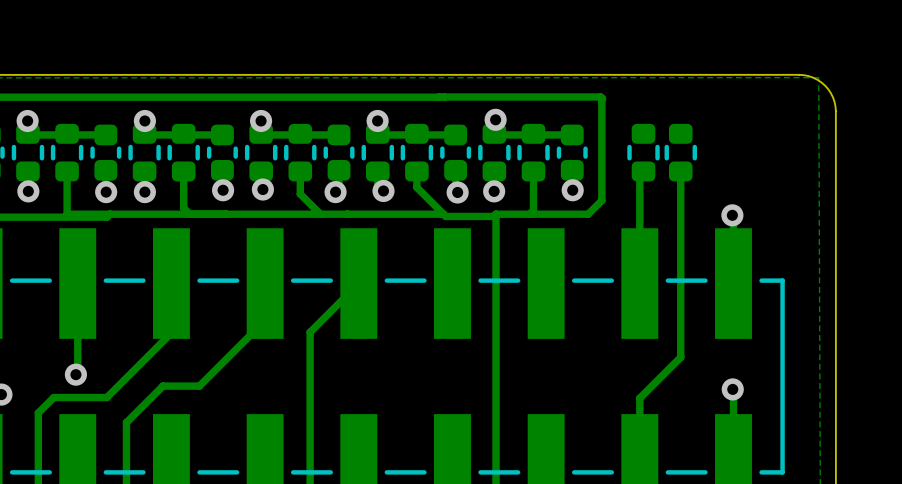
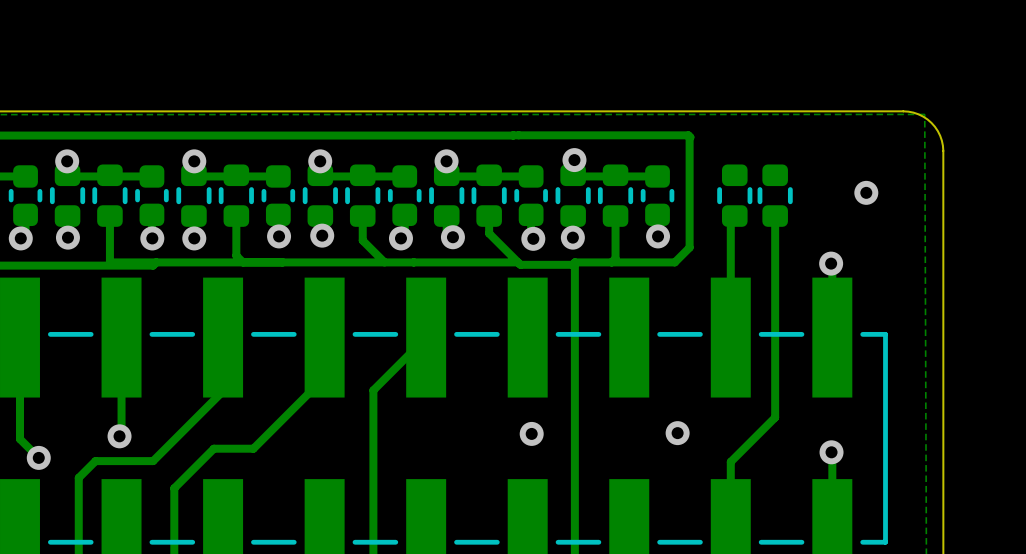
via: none -> (866, 192)
via: none -> (677, 433)
via: none -> (531, 433)

